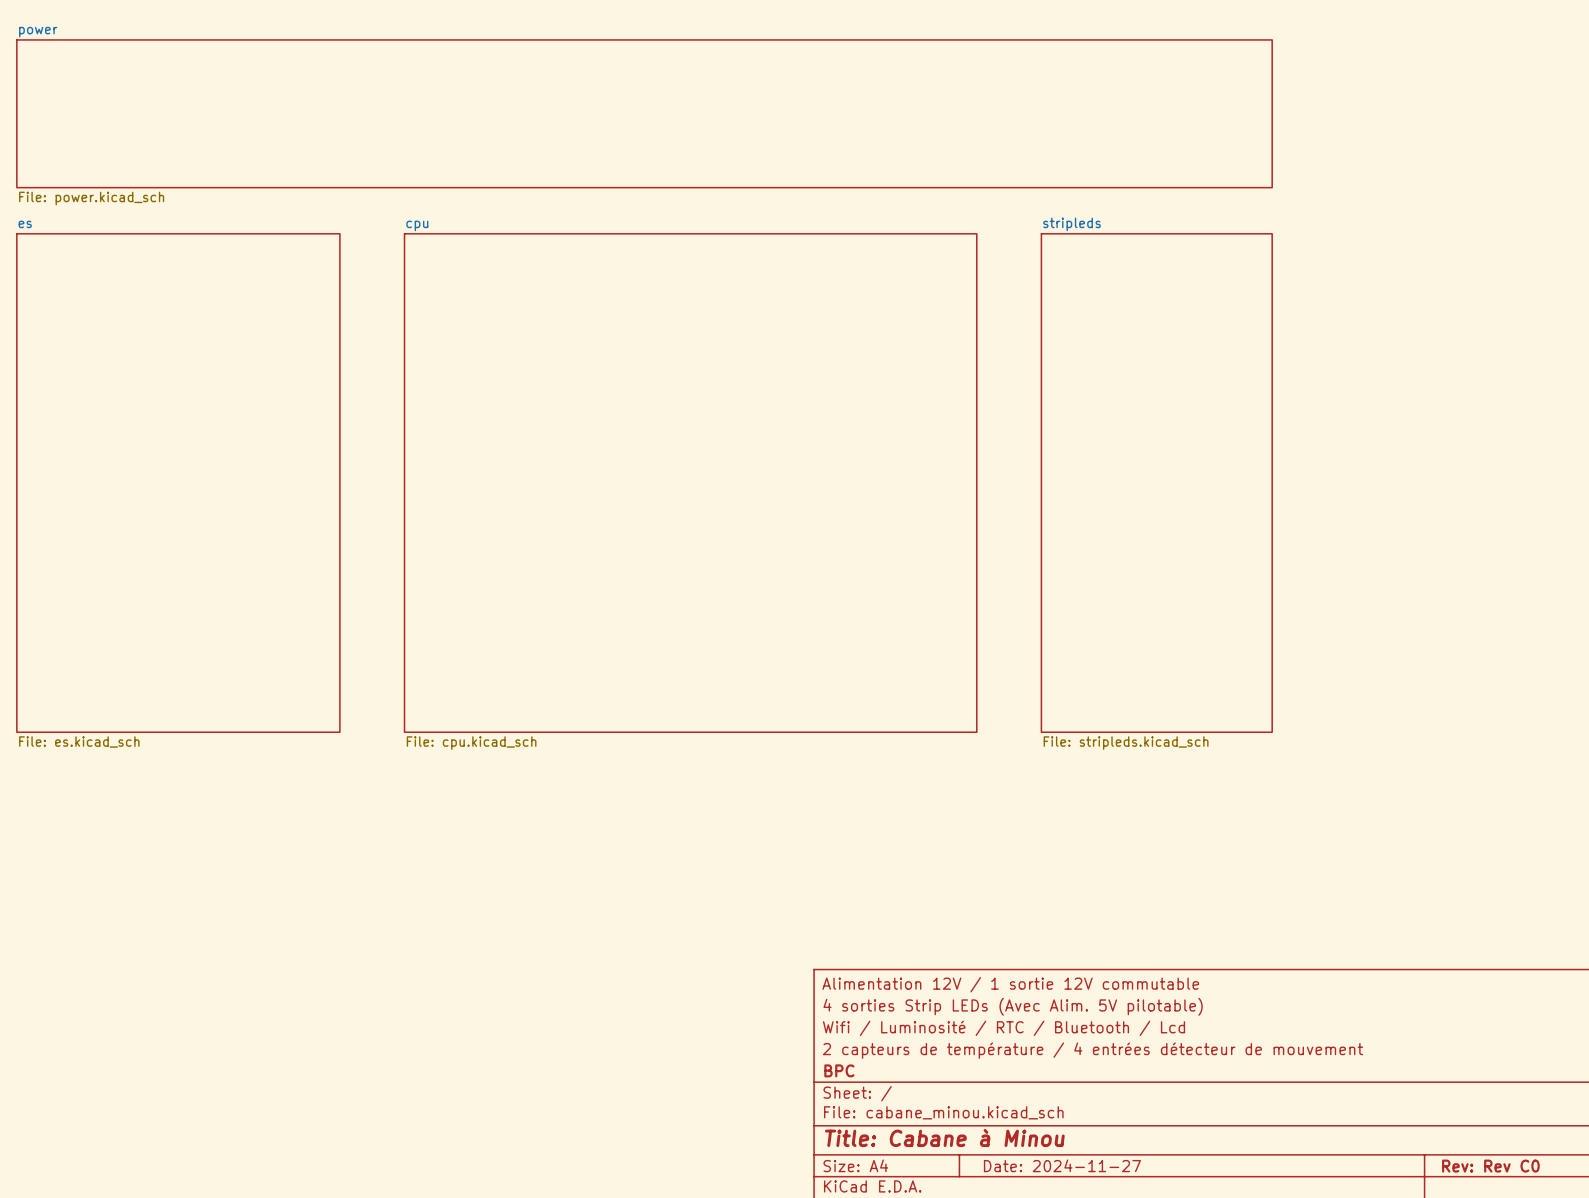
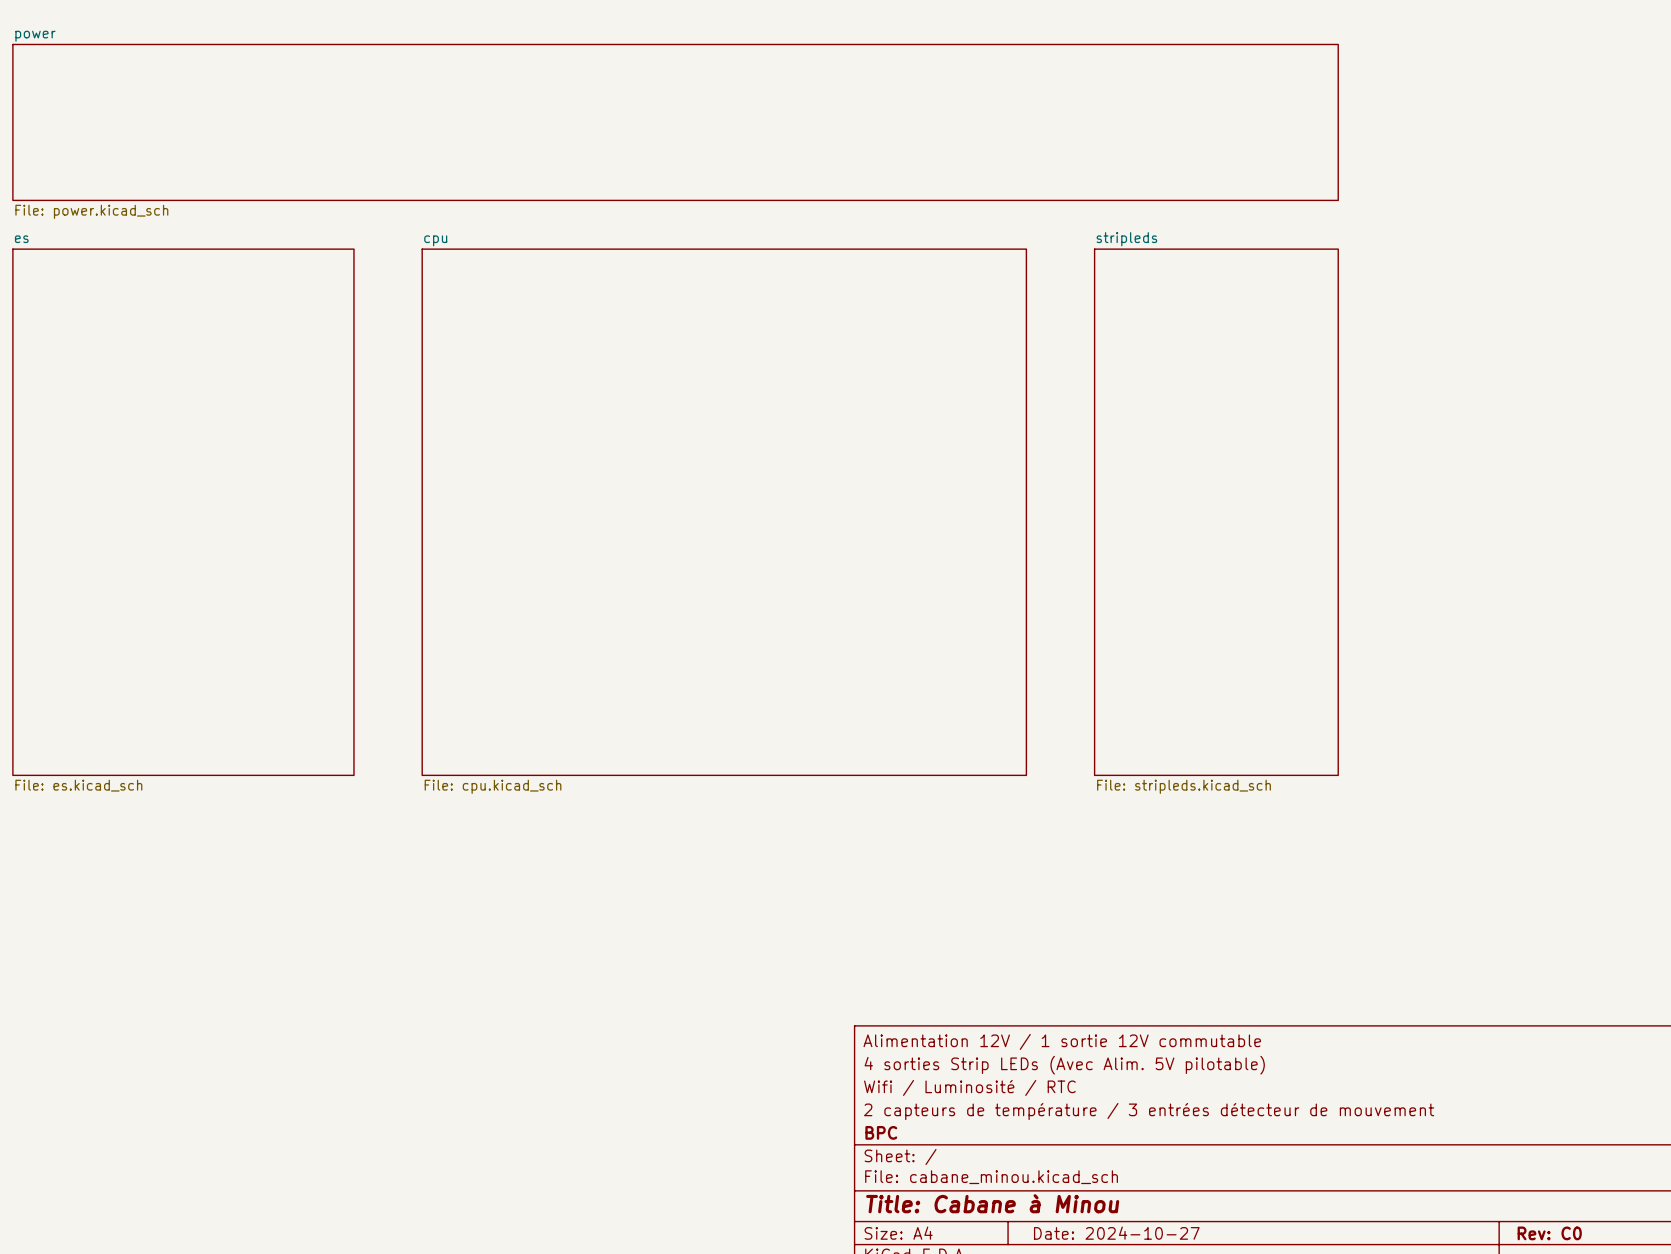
title block: Wifi / Luminosité / RTC / Bluetooth / Lcd (1004, 1028) -> Wifi / Luminosité / RTC (969, 1087)
title block: 2 capteurs de température / 4 entrées détecteur de mouvement (1093, 1050) -> 2 capteurs de température / 3 entrées détecteur de mouvement (1149, 1111)
title block: Date: 2024-11-27 (1062, 1165) -> Date: 2024-10-27 (1116, 1233)
title block: Rev: Rev C0 (1490, 1166) -> Rev: C0 (1549, 1233)

